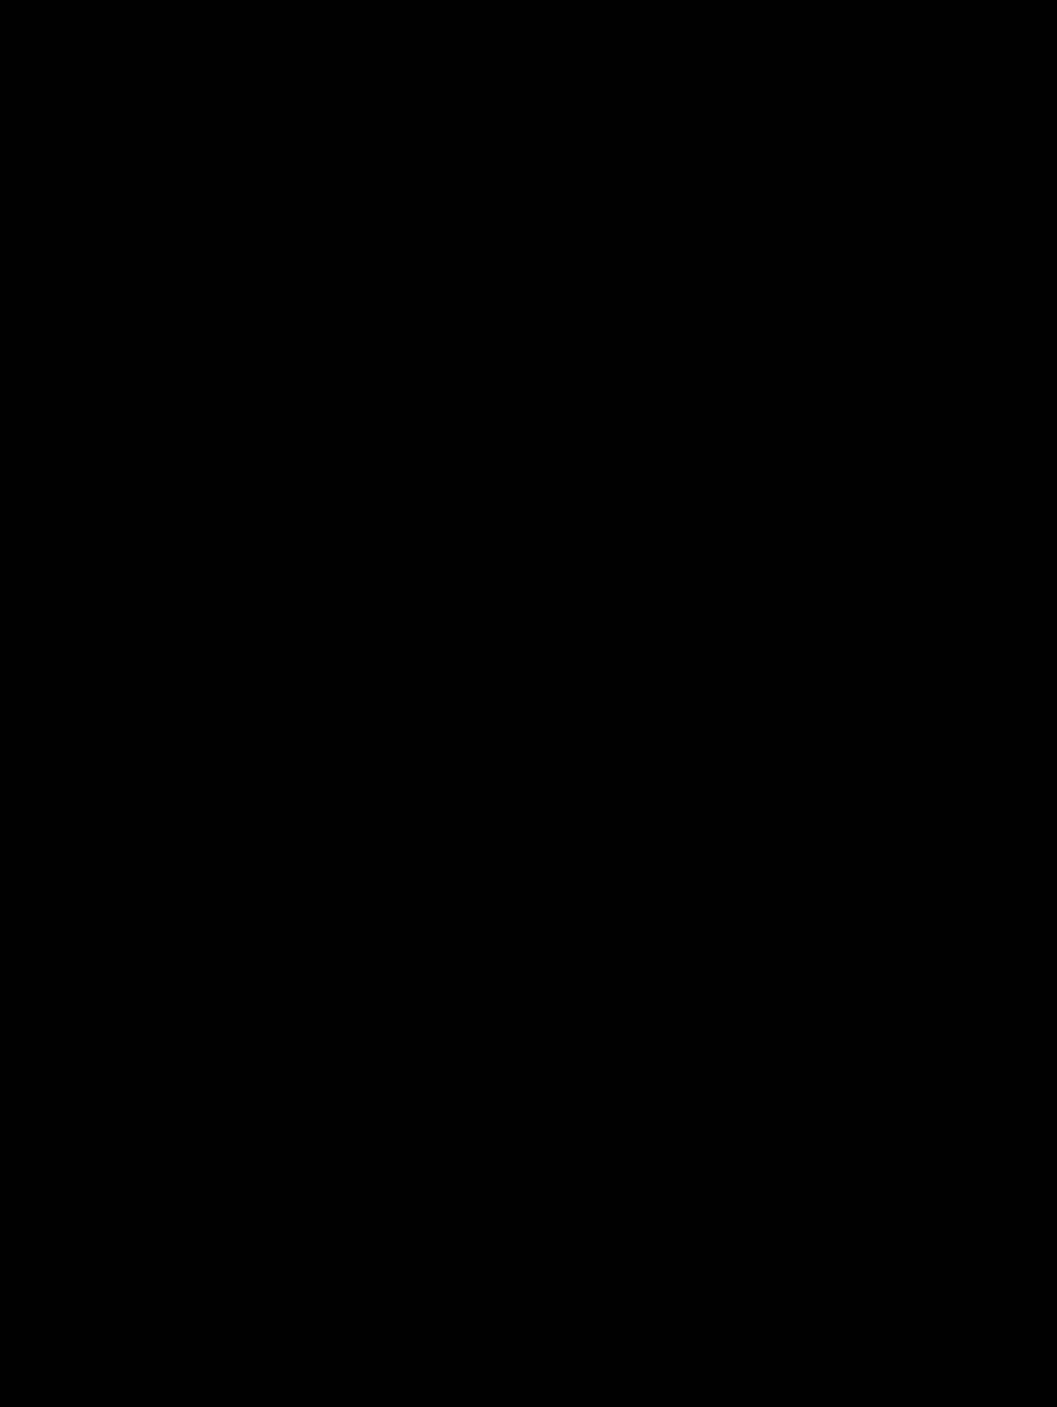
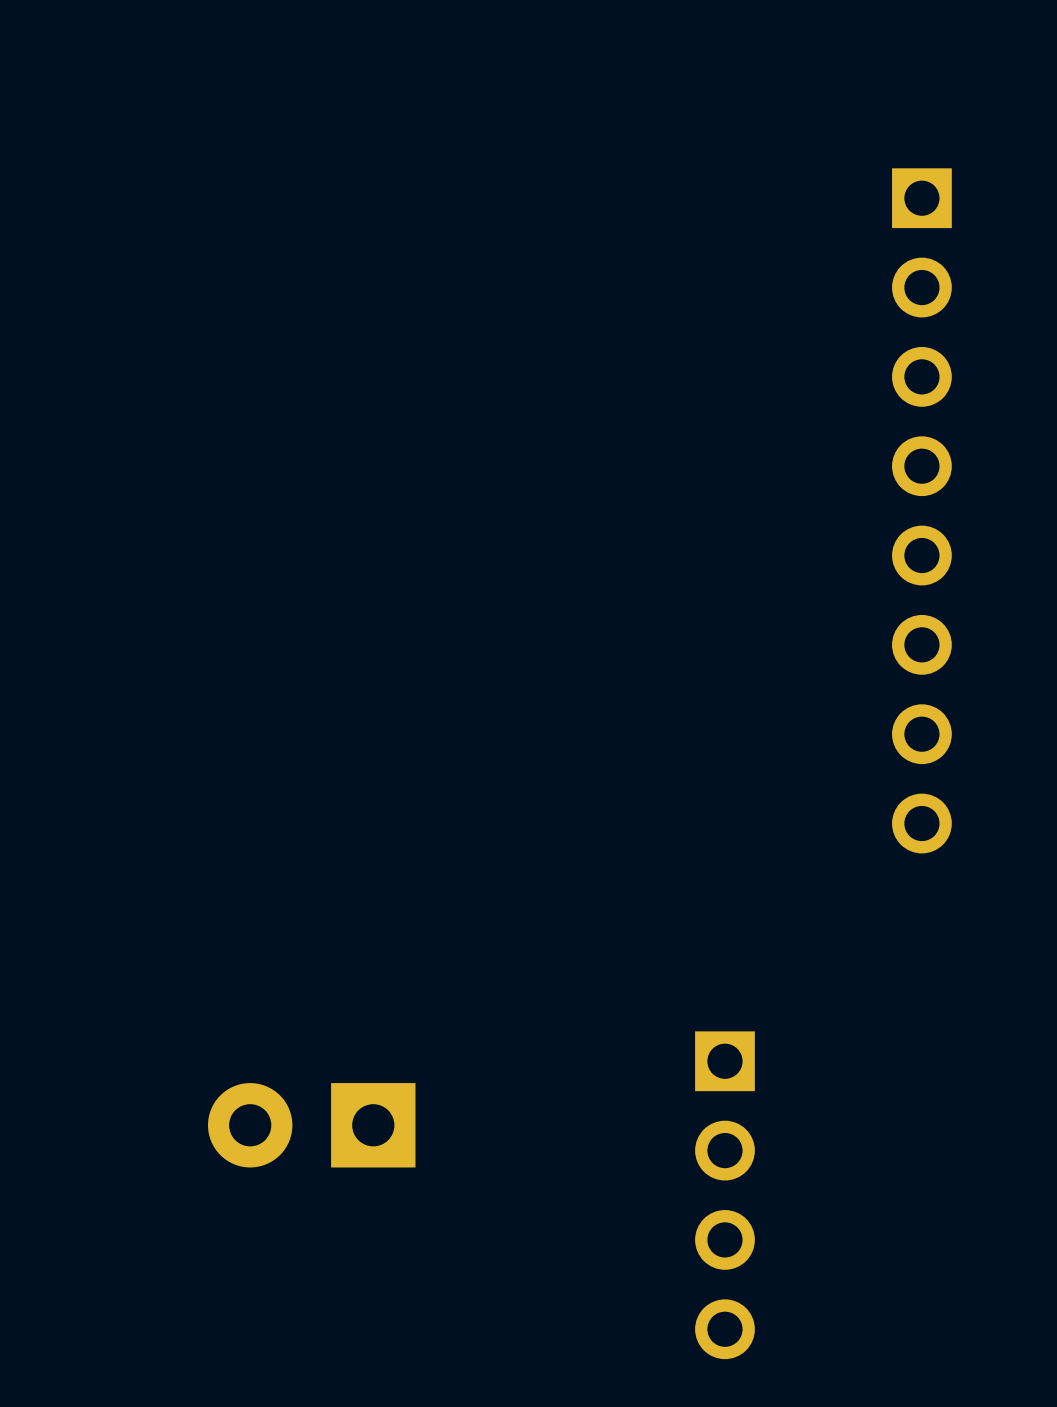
part: none -> (921, 510)
part: none -> (311, 1125)
part: none -> (724, 1195)

